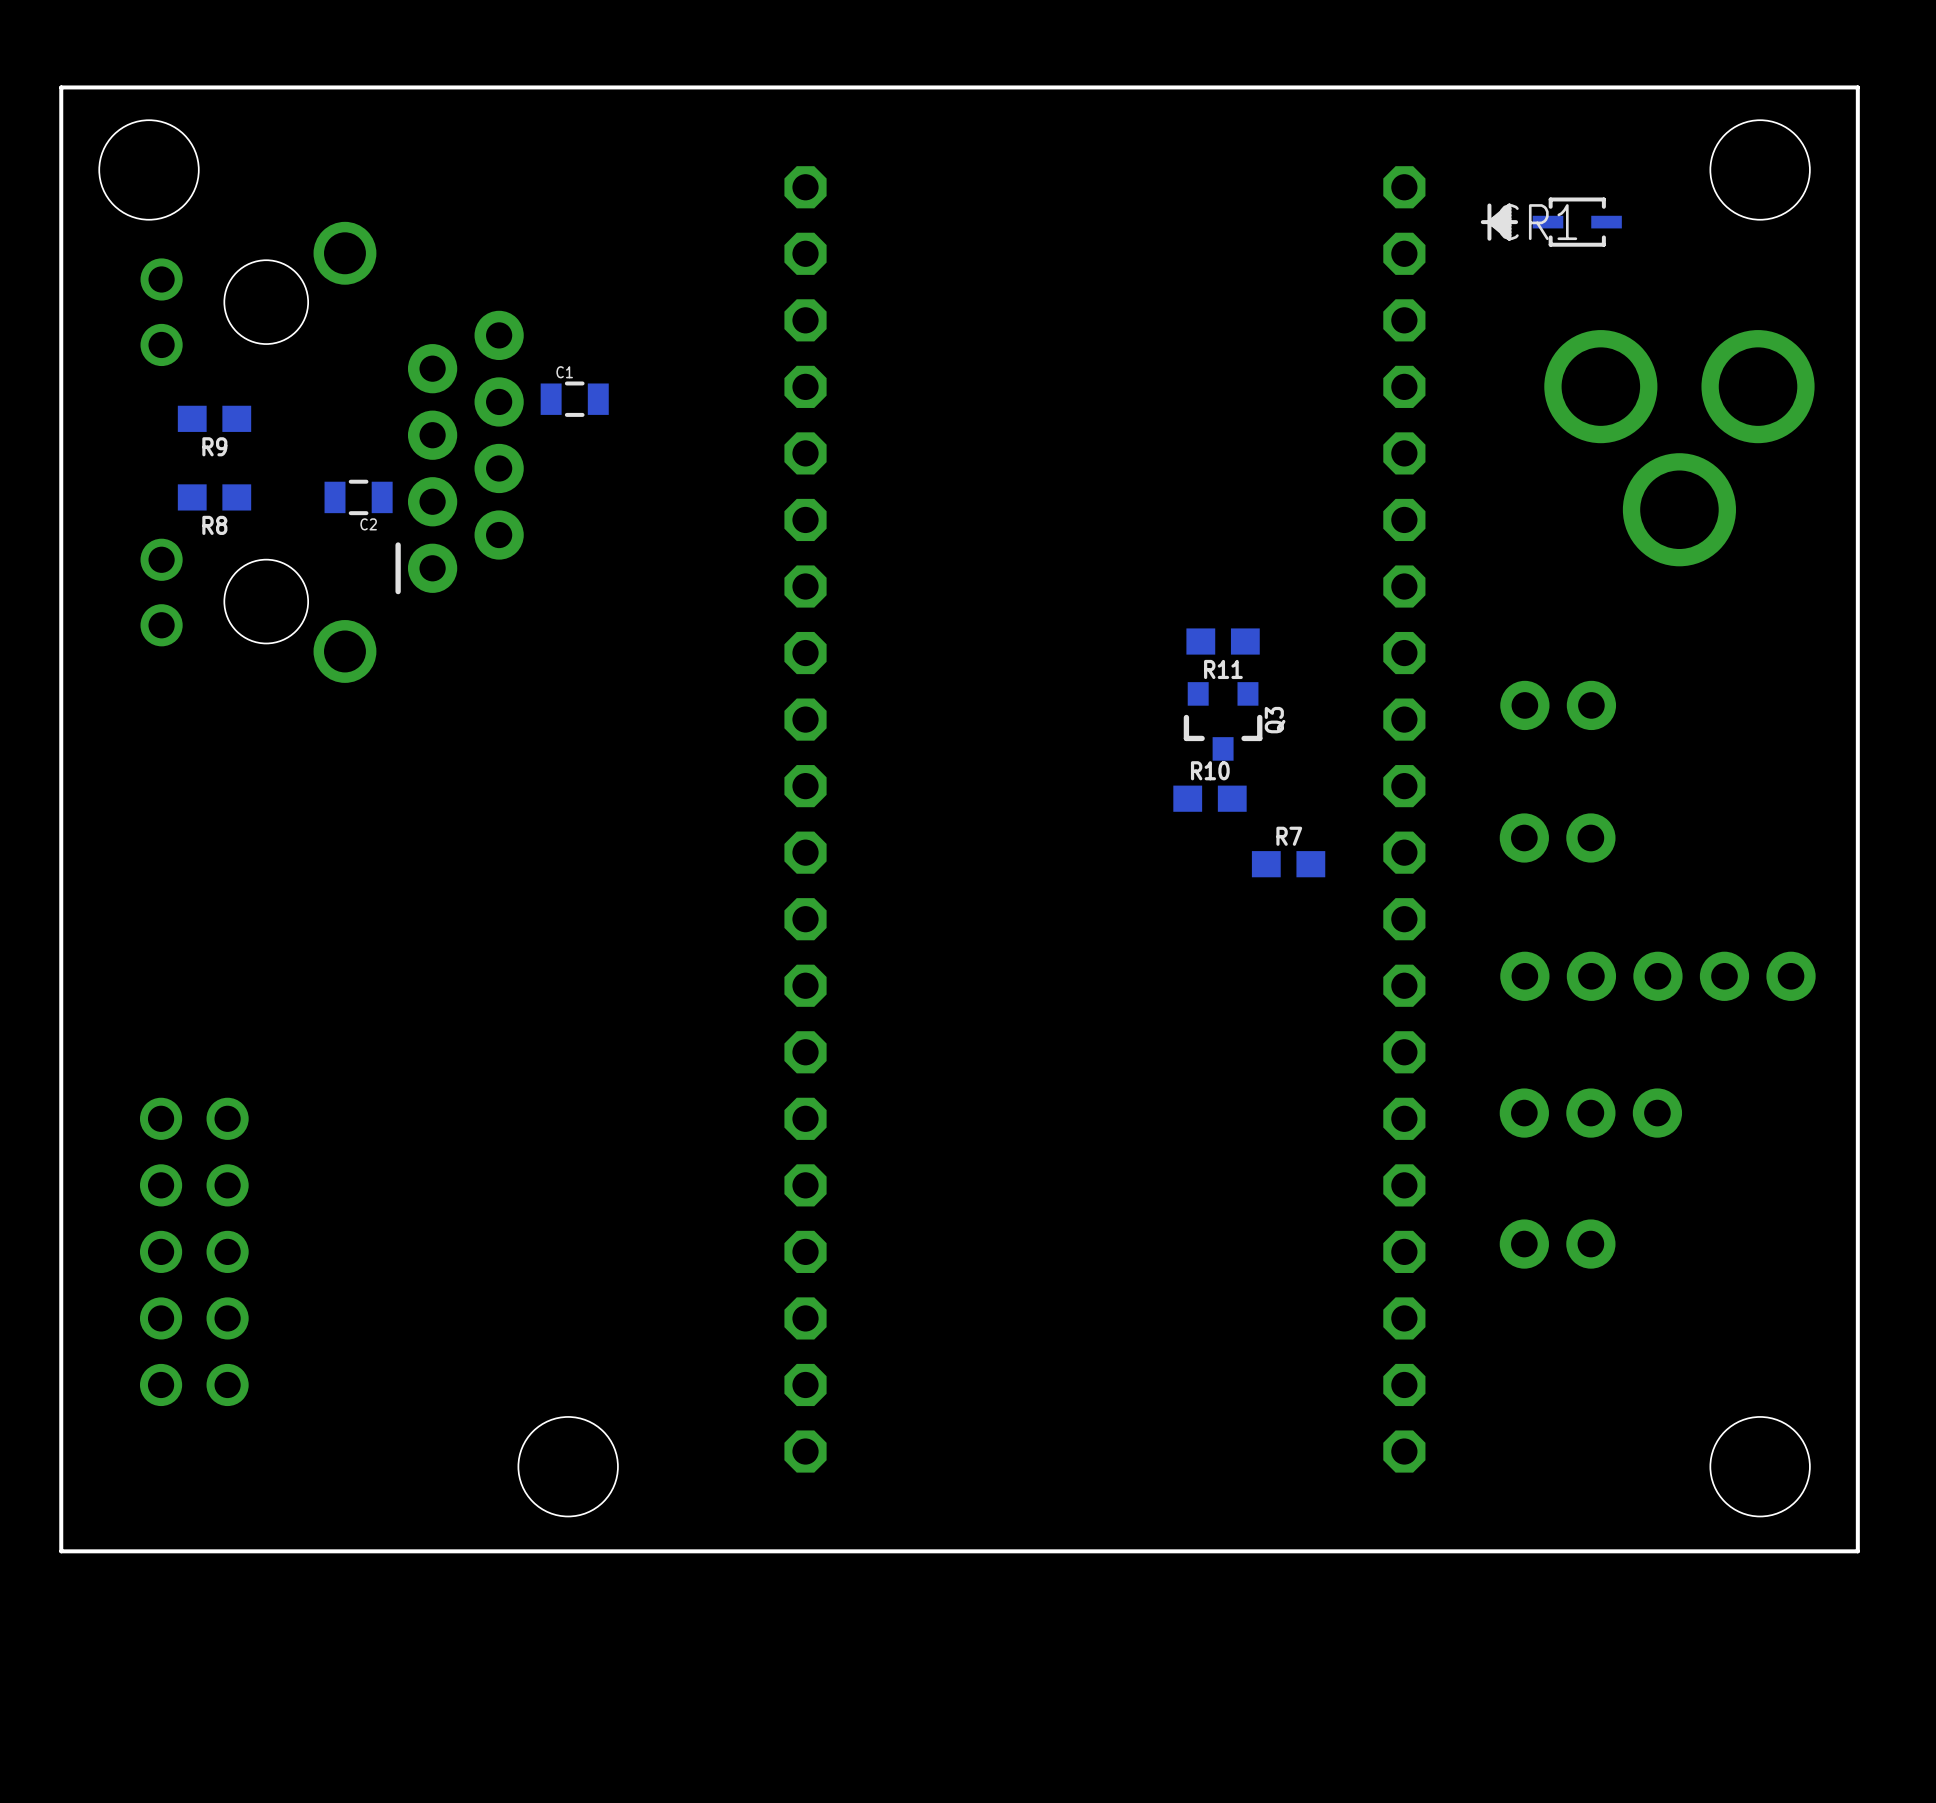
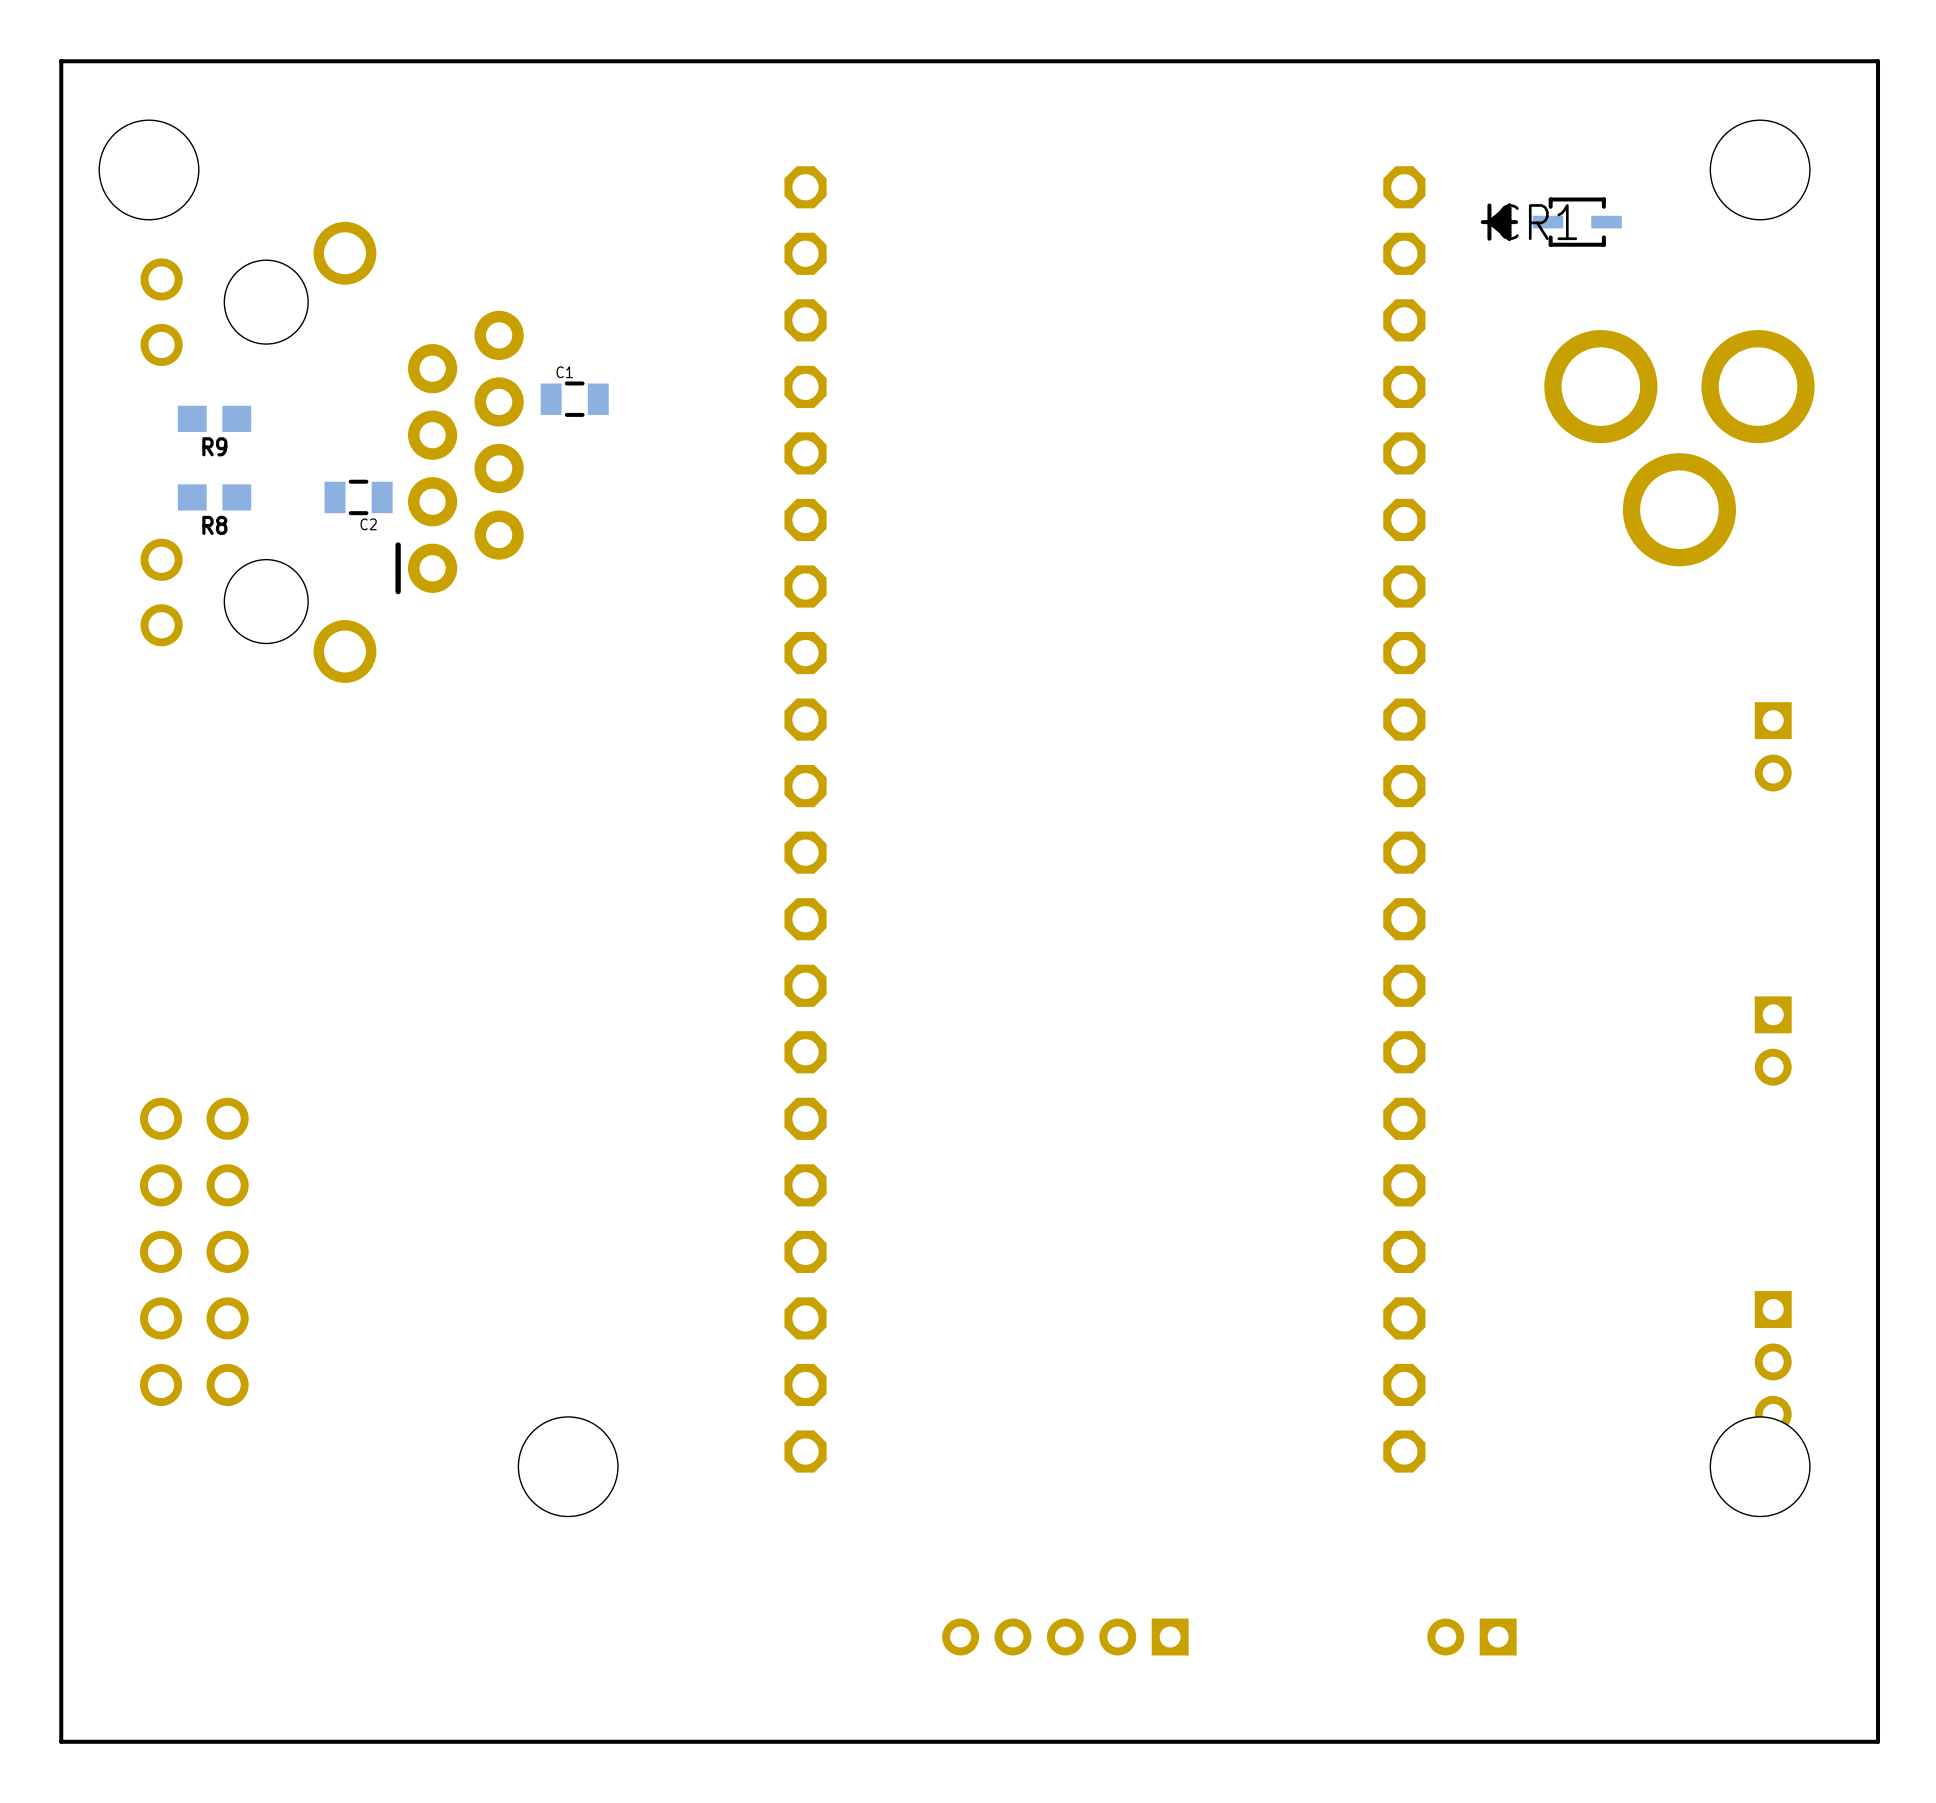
board edge: (61, 87) (1857, 87) (1857, 1551) (61, 1551) -> (61, 87) (61, 61) (1878, 61) (1878, 1741) (61, 1741) (61, 1551)
R11: (1223, 641) -> none
part: (1558, 705) -> none
Q3: (1223, 721) -> none
part: none -> (1773, 746)
R10: (1209, 798) -> none
part: (1557, 837) -> none
R7: (1288, 864) -> none
part: (1657, 976) -> none
part: none -> (1773, 1041)
part: (1590, 1113) -> none
part: (1557, 1244) -> none
part: none -> (1773, 1361)
part: none -> (1065, 1637)
part: none -> (1471, 1637)

